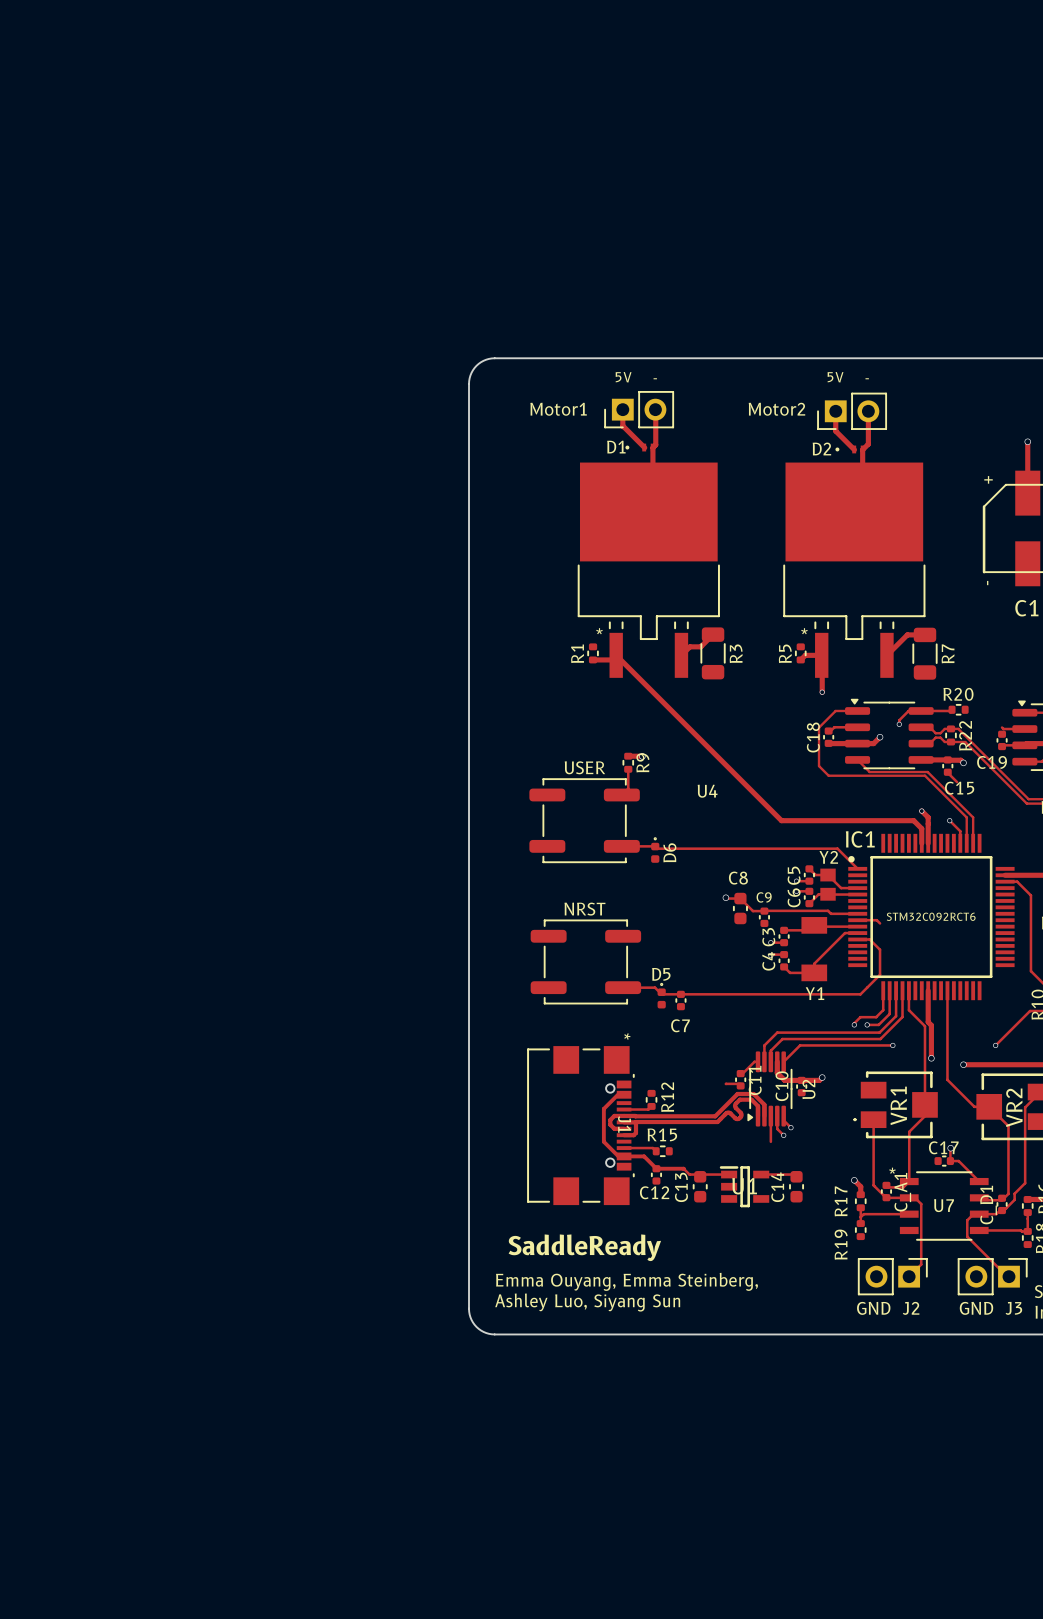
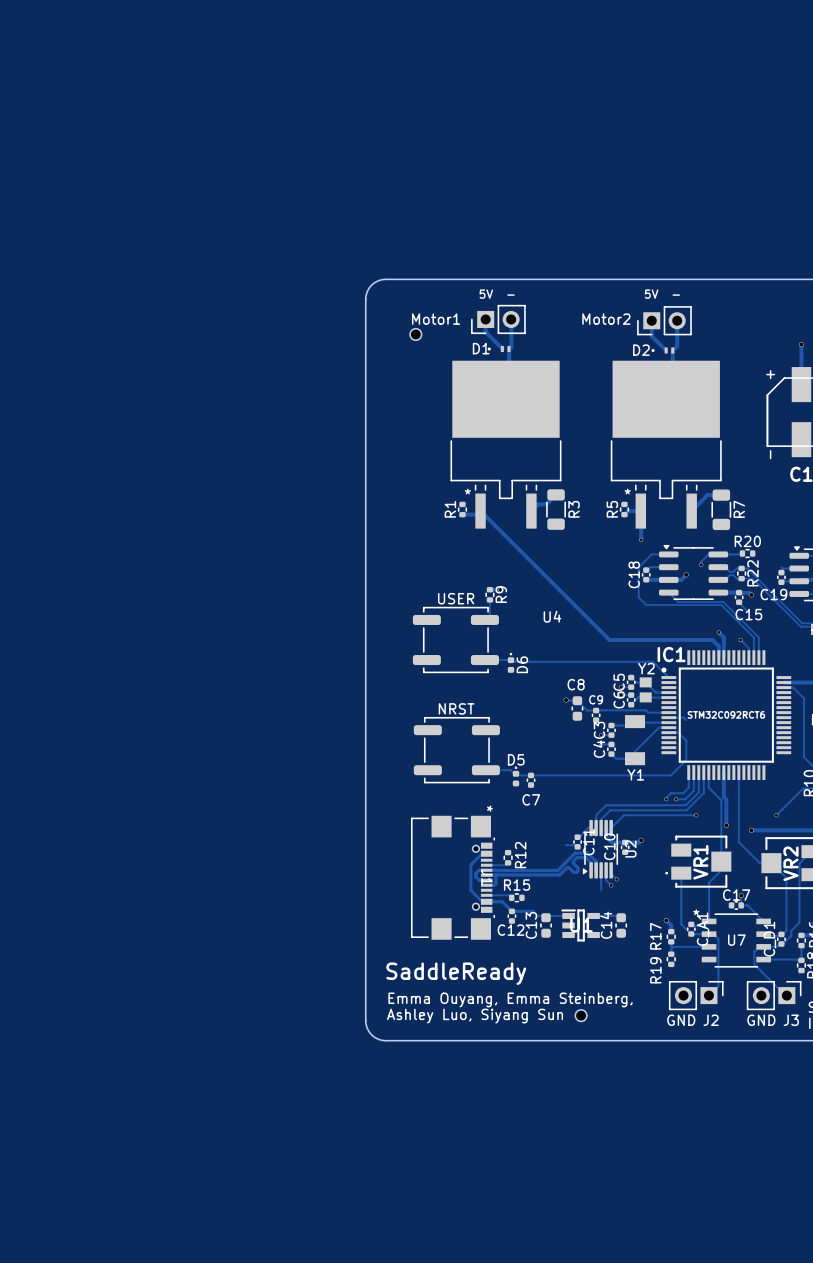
part: none -> (415, 334)
part: none -> (581, 1015)

